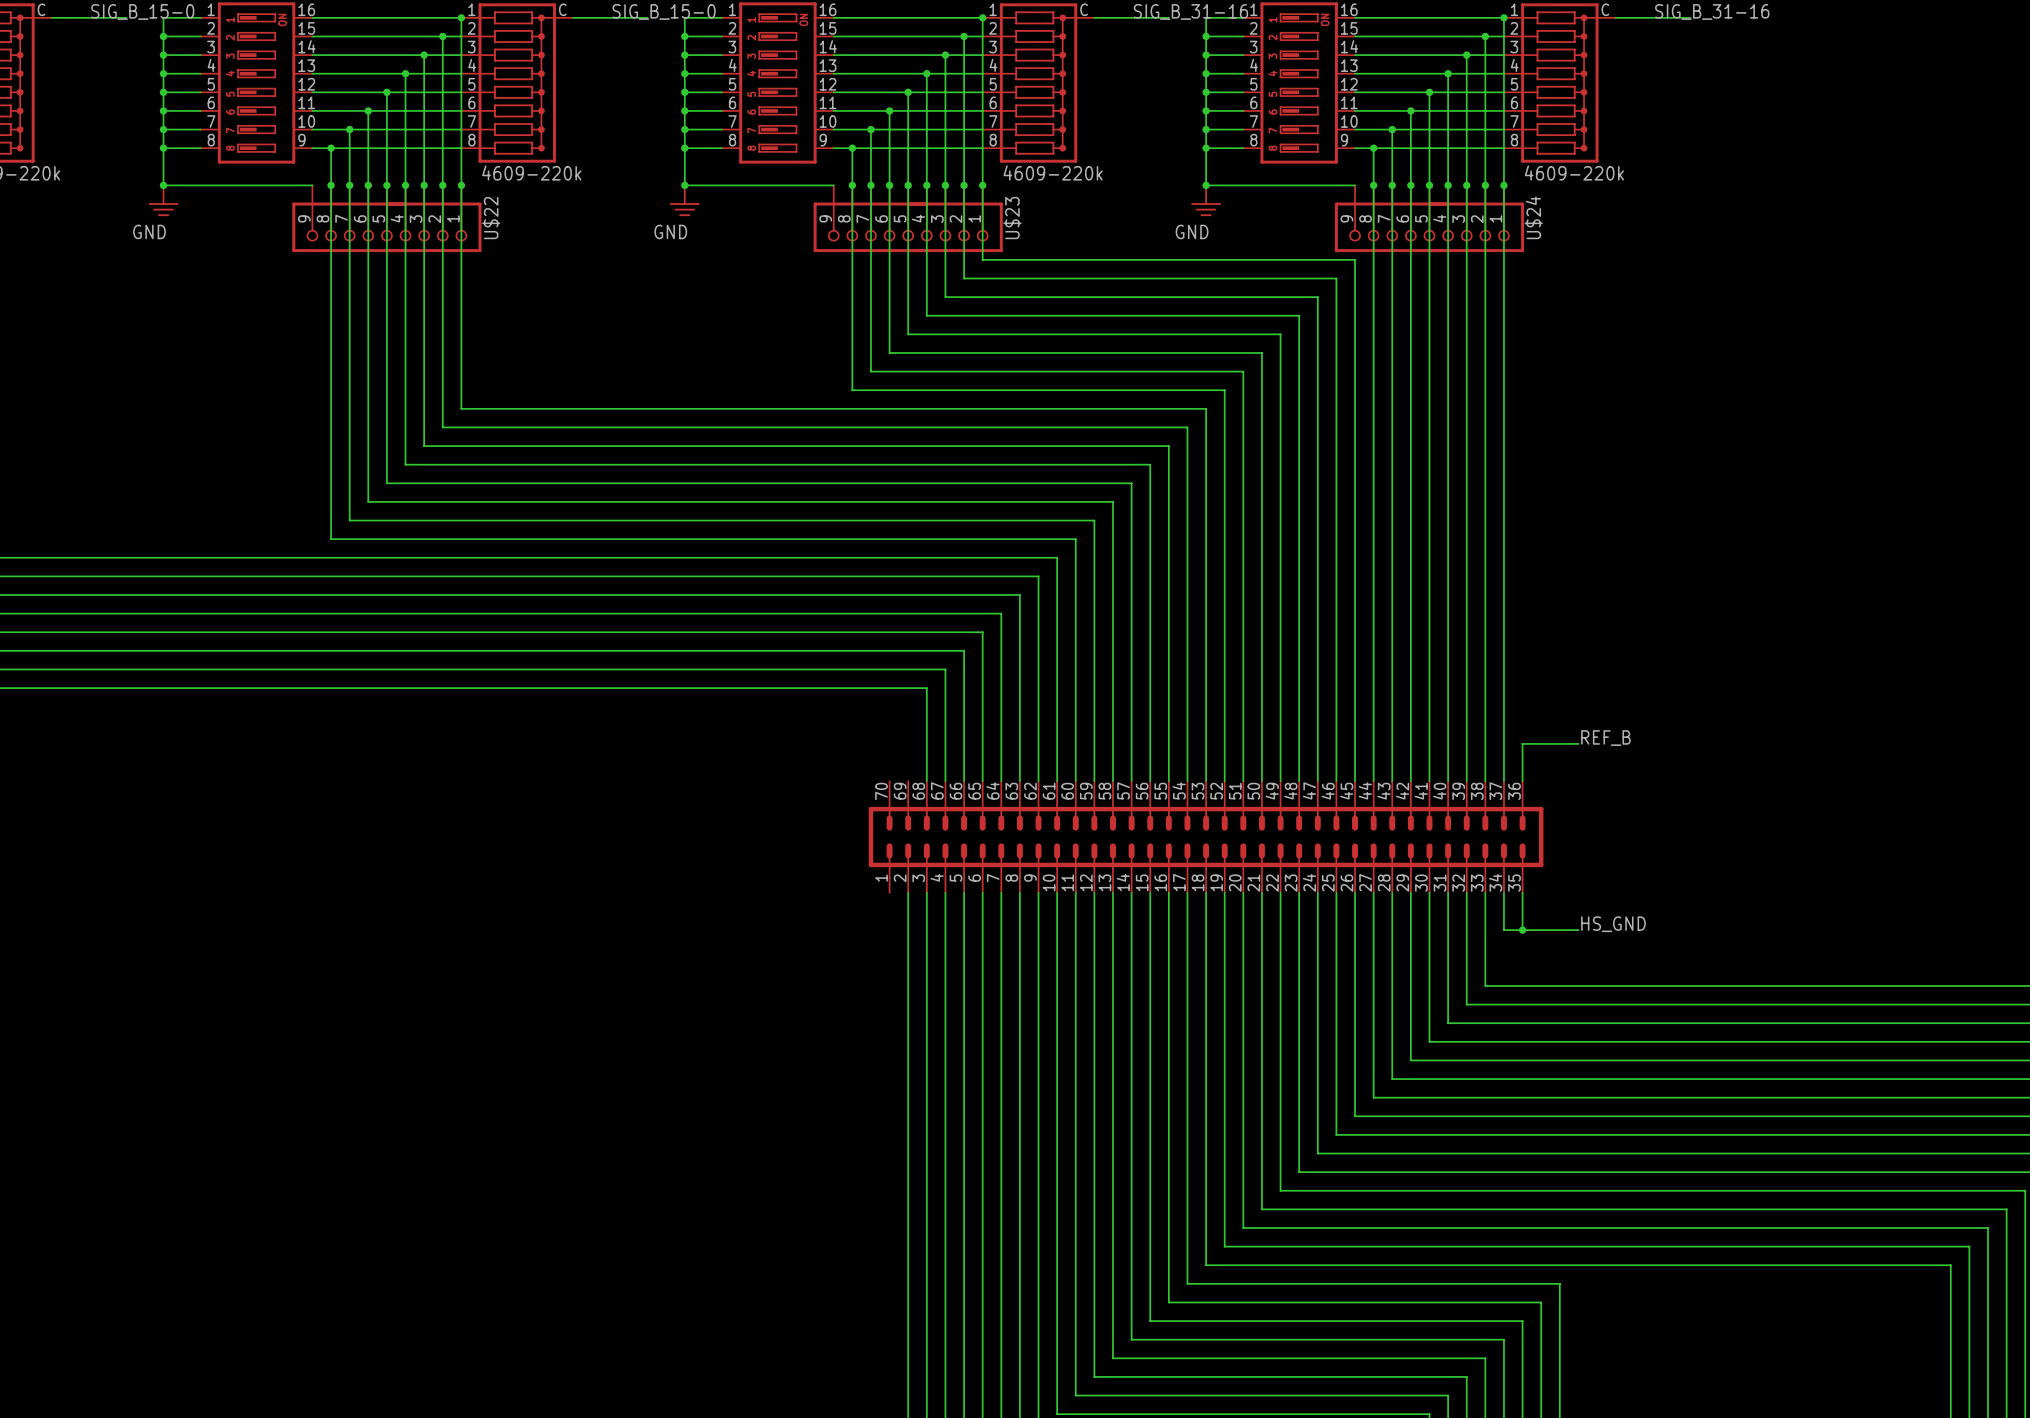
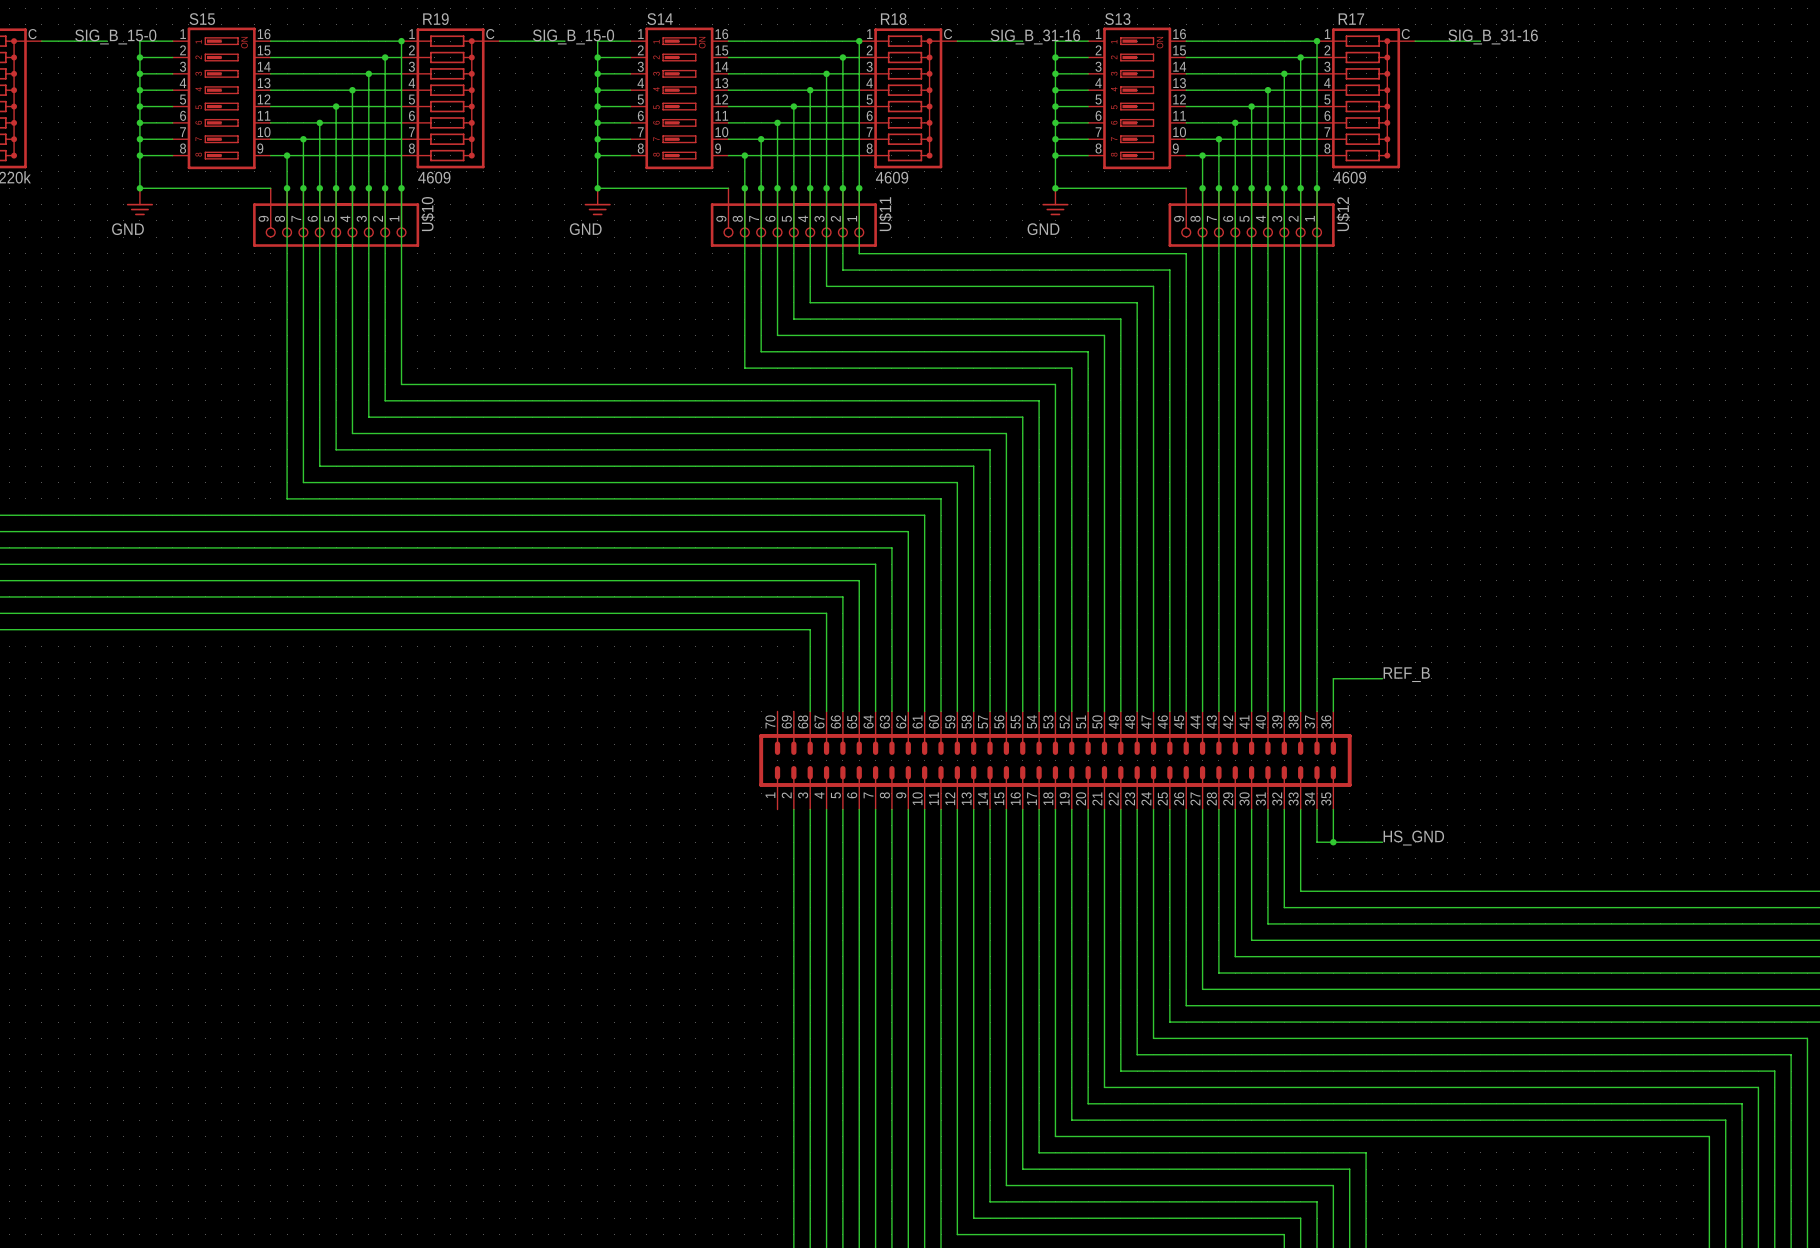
R19 value: 4609-220k (531, 173) -> 4609 (434, 177)
R18 value: 4609-220k (1053, 173) -> 4609 (892, 177)
R17 value: 4609-220k (1574, 173) -> 4609 (1349, 177)
U$24 name: U$24 (1533, 217) -> U$12 (1343, 214)
U$22 name: U$22 (491, 218) -> U$10 (427, 214)
U$23 name: U$23 (1012, 218) -> U$11 (885, 214)

